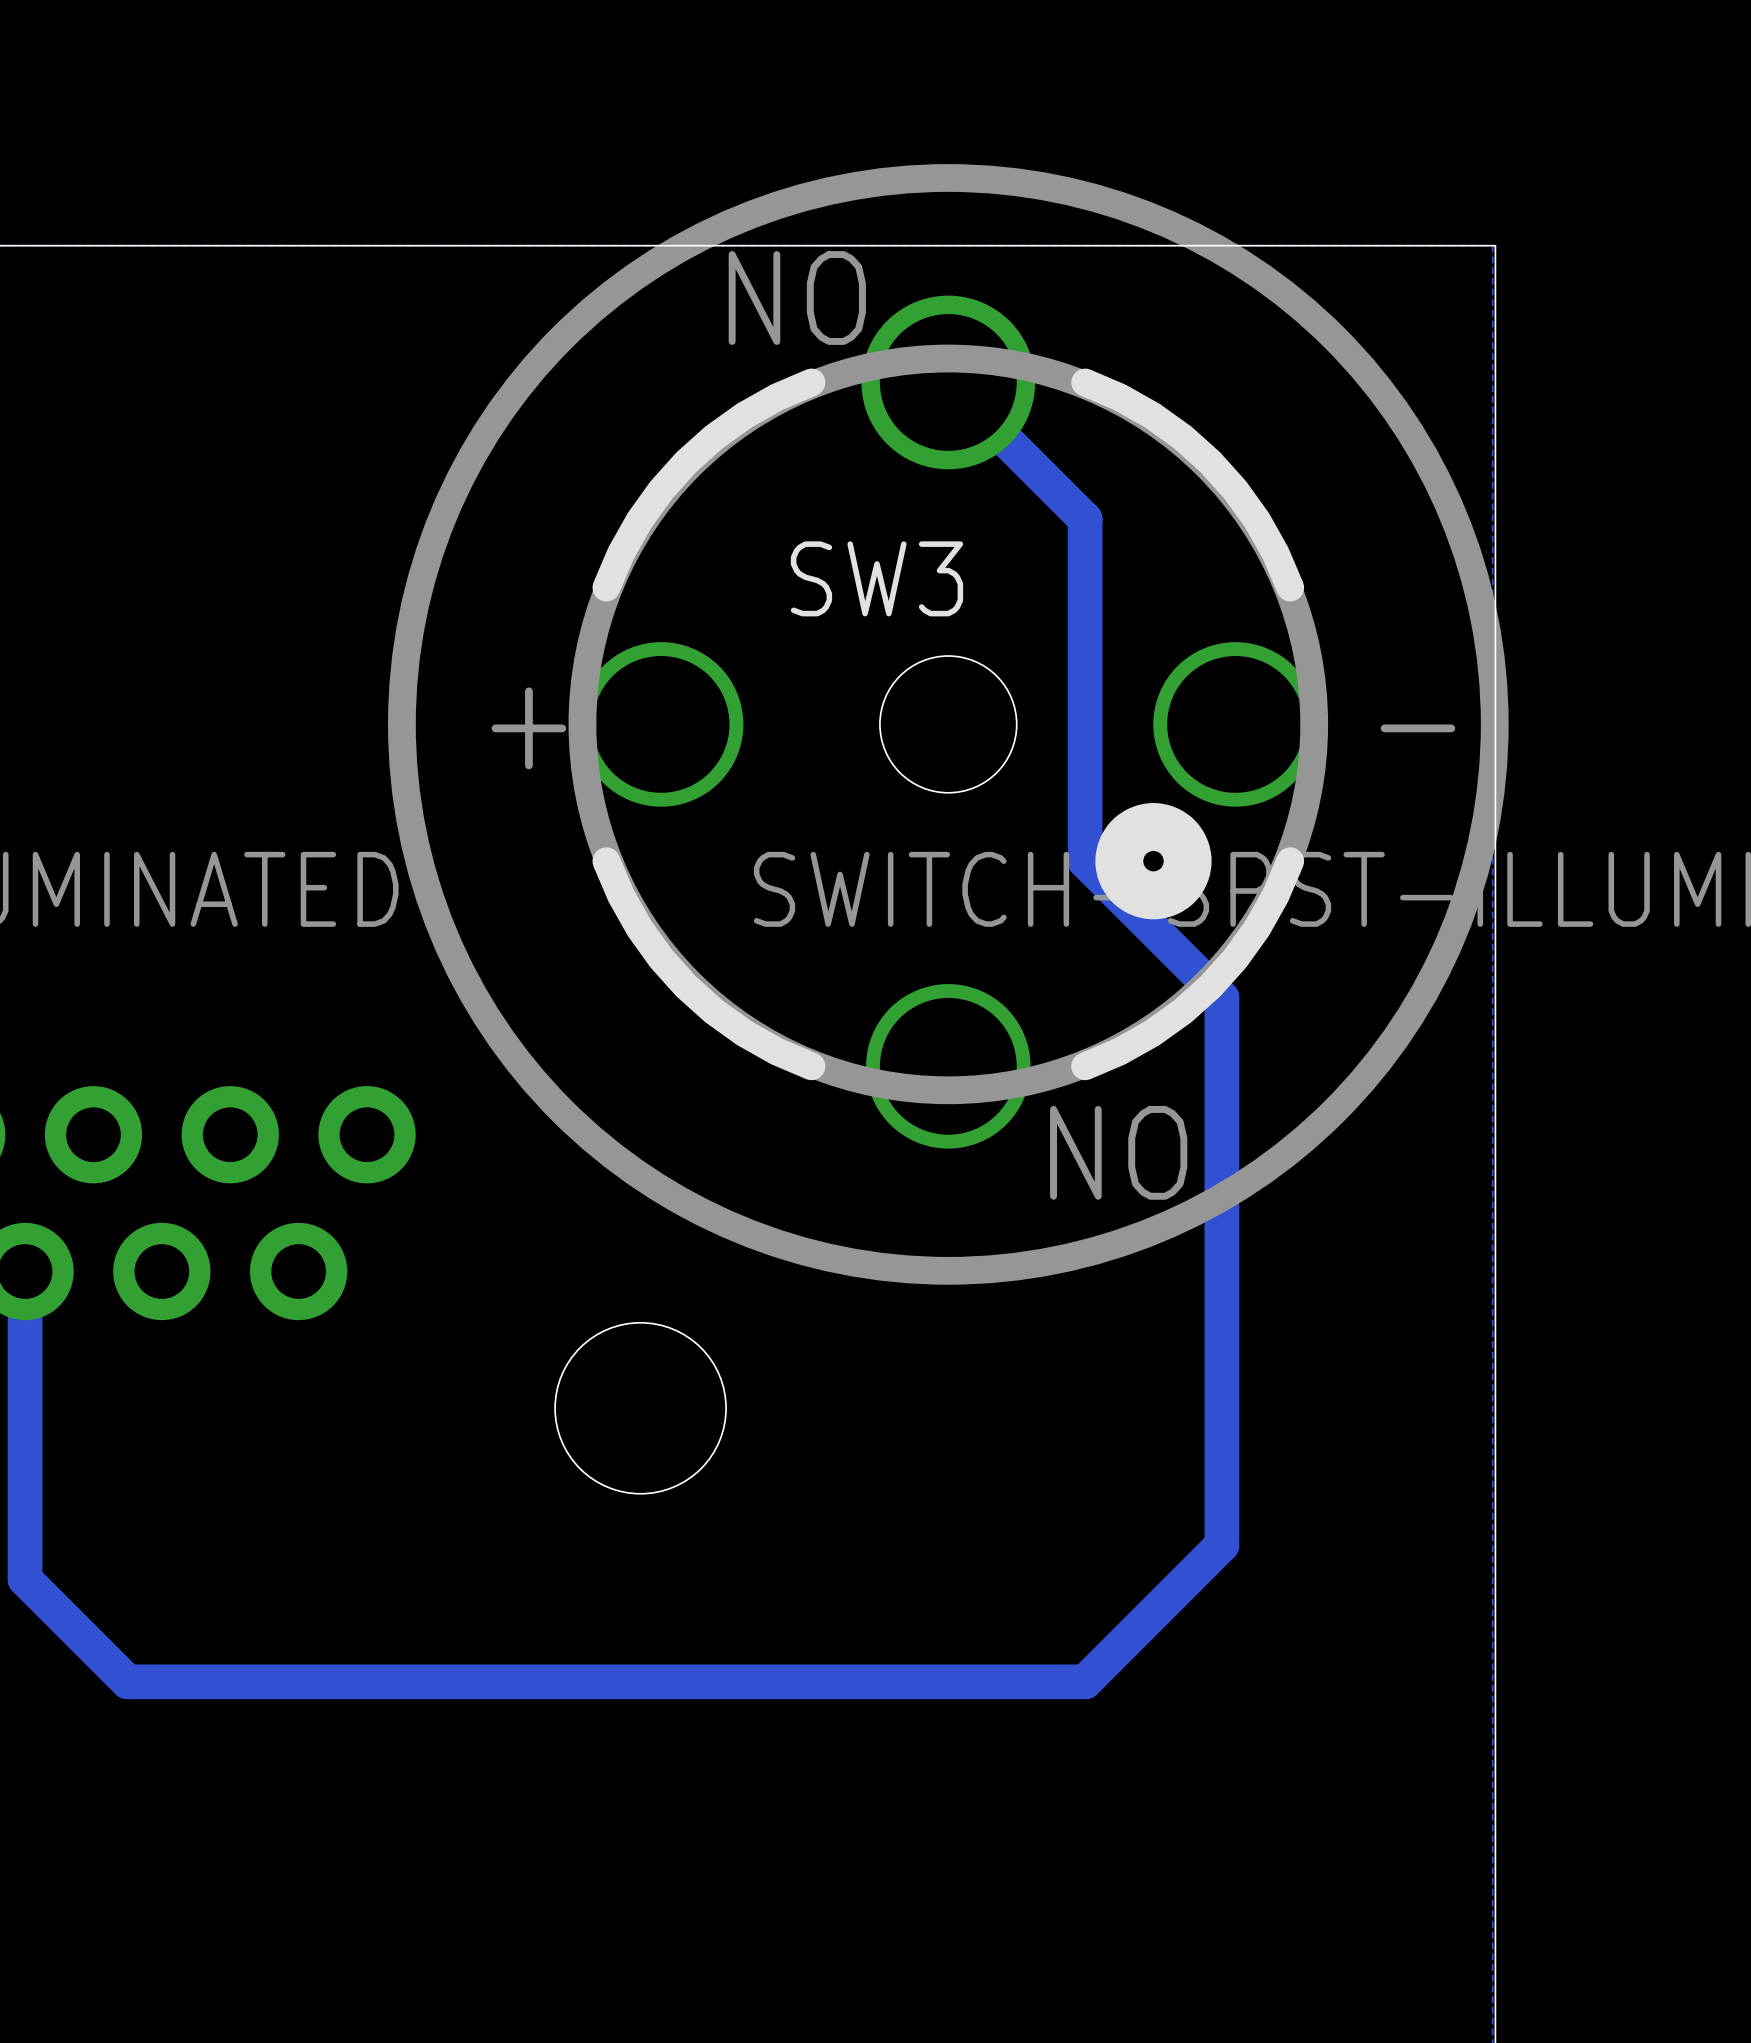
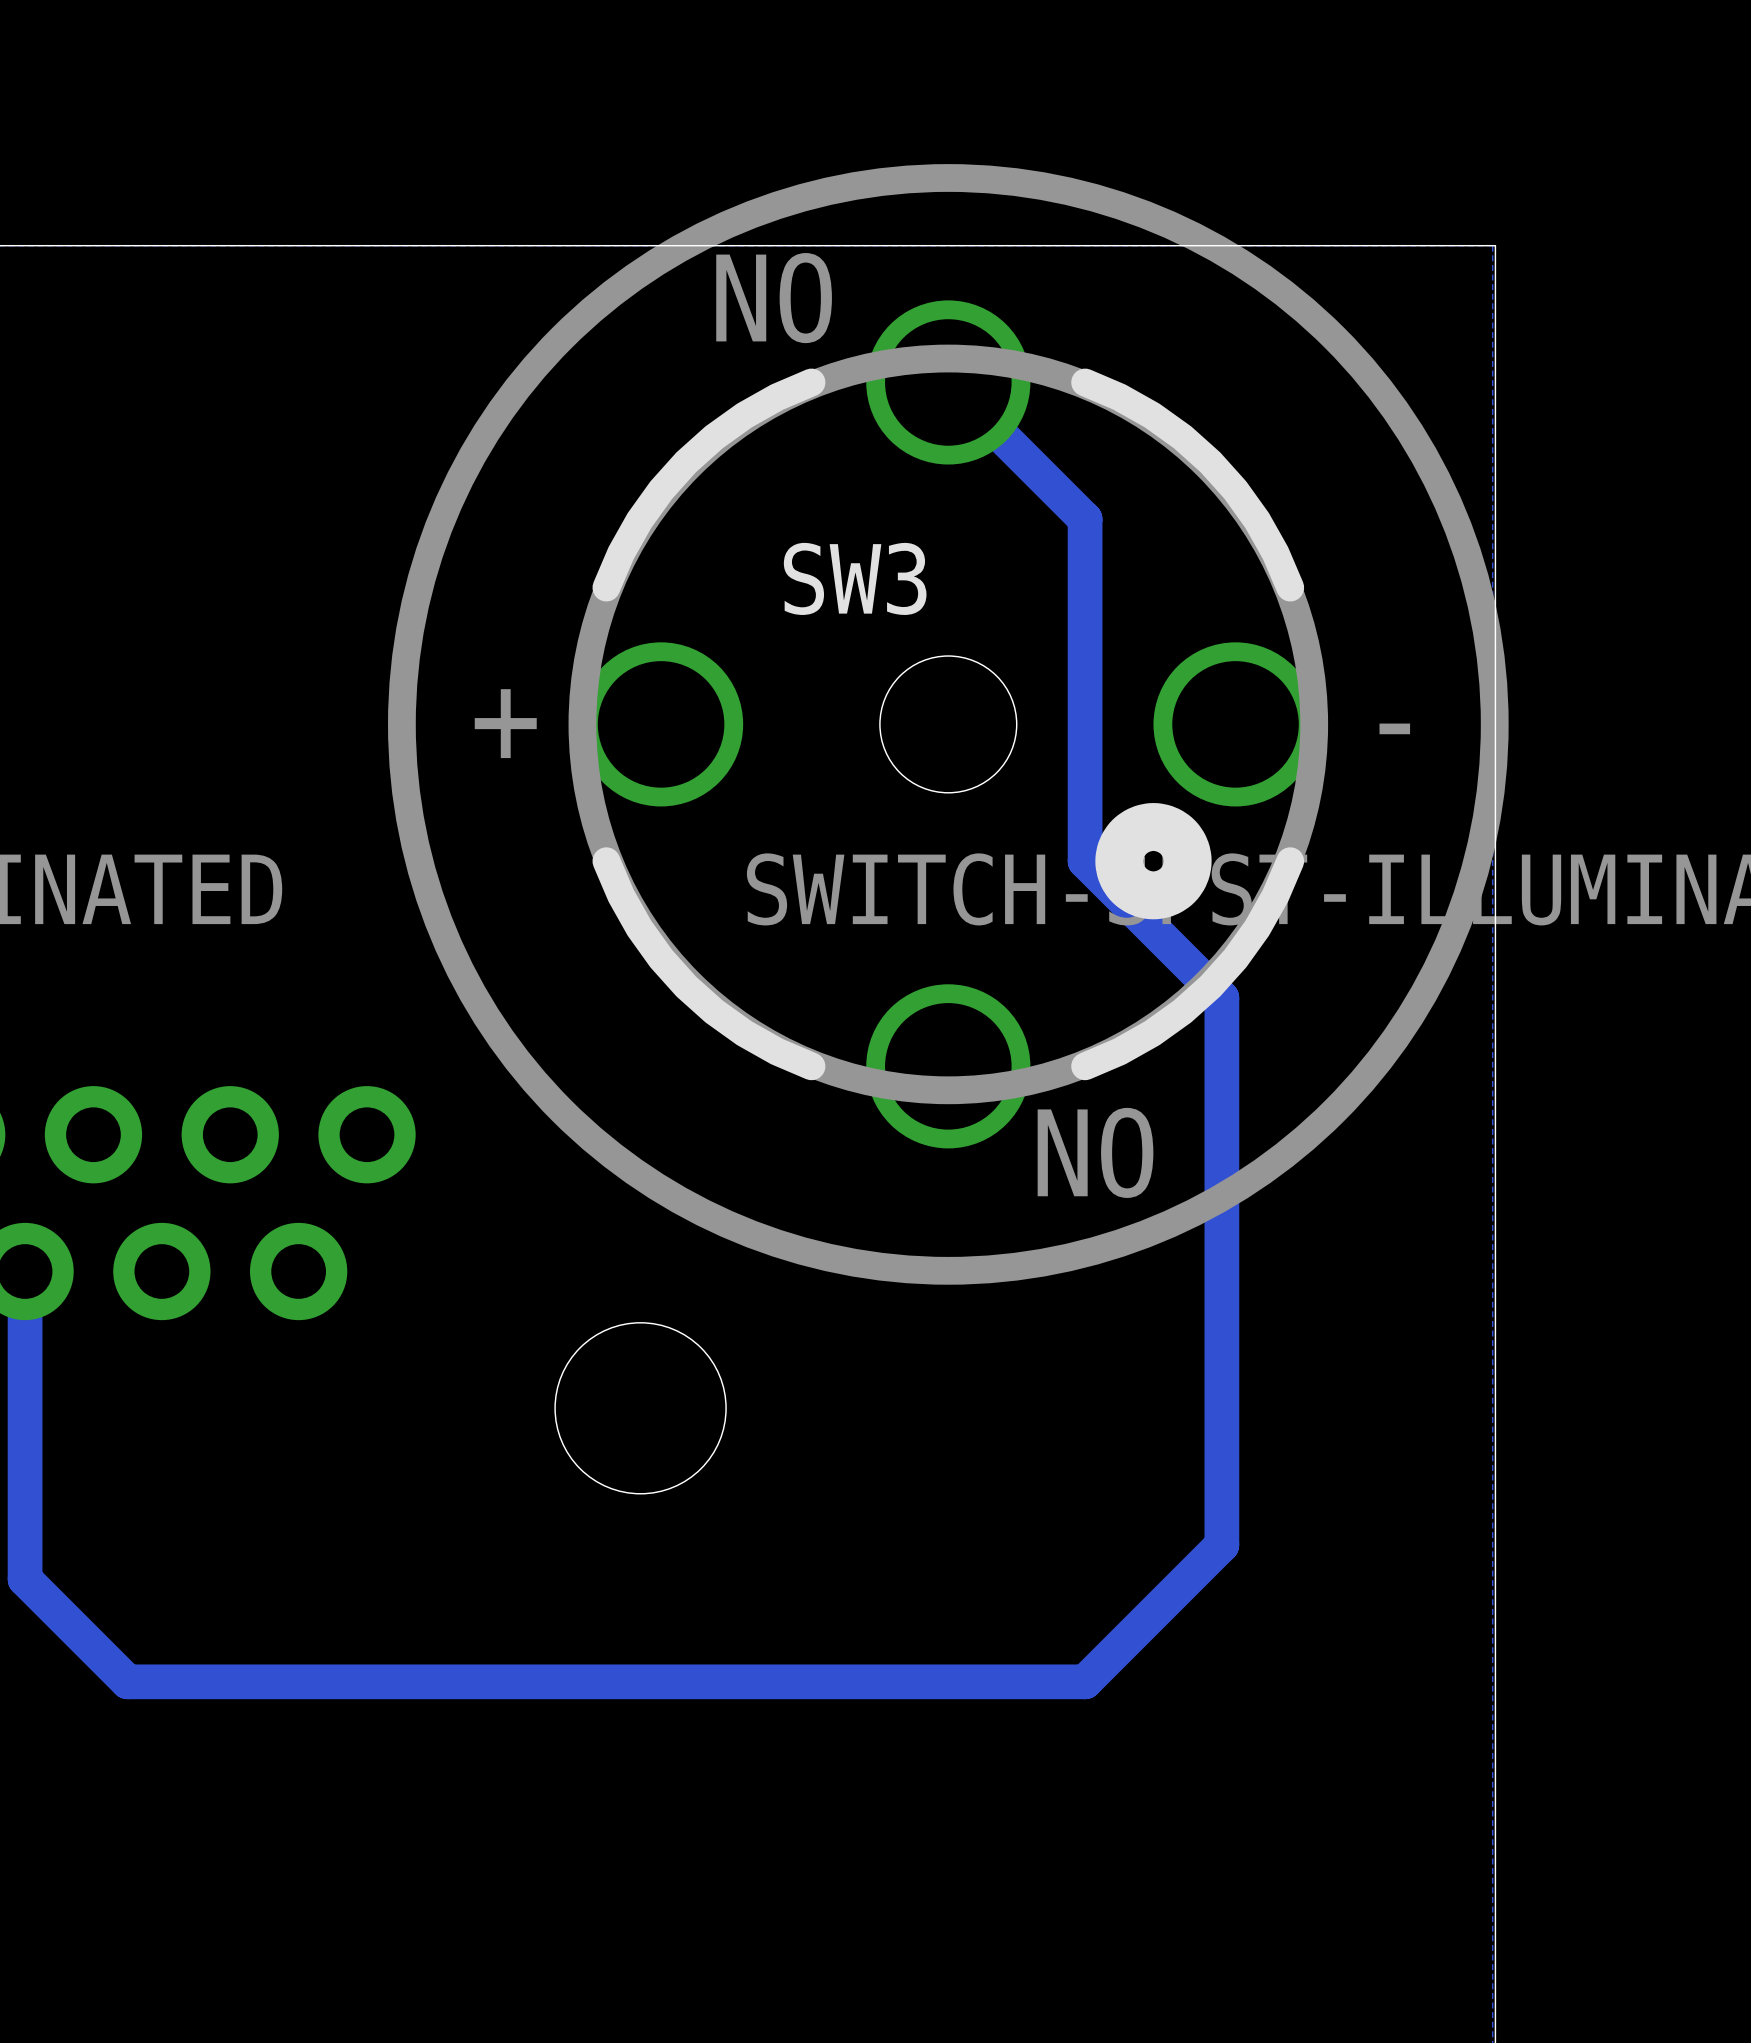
SW3 footprint: [388, 164, 1509, 1285] -> [388, 164, 1509, 1285]

